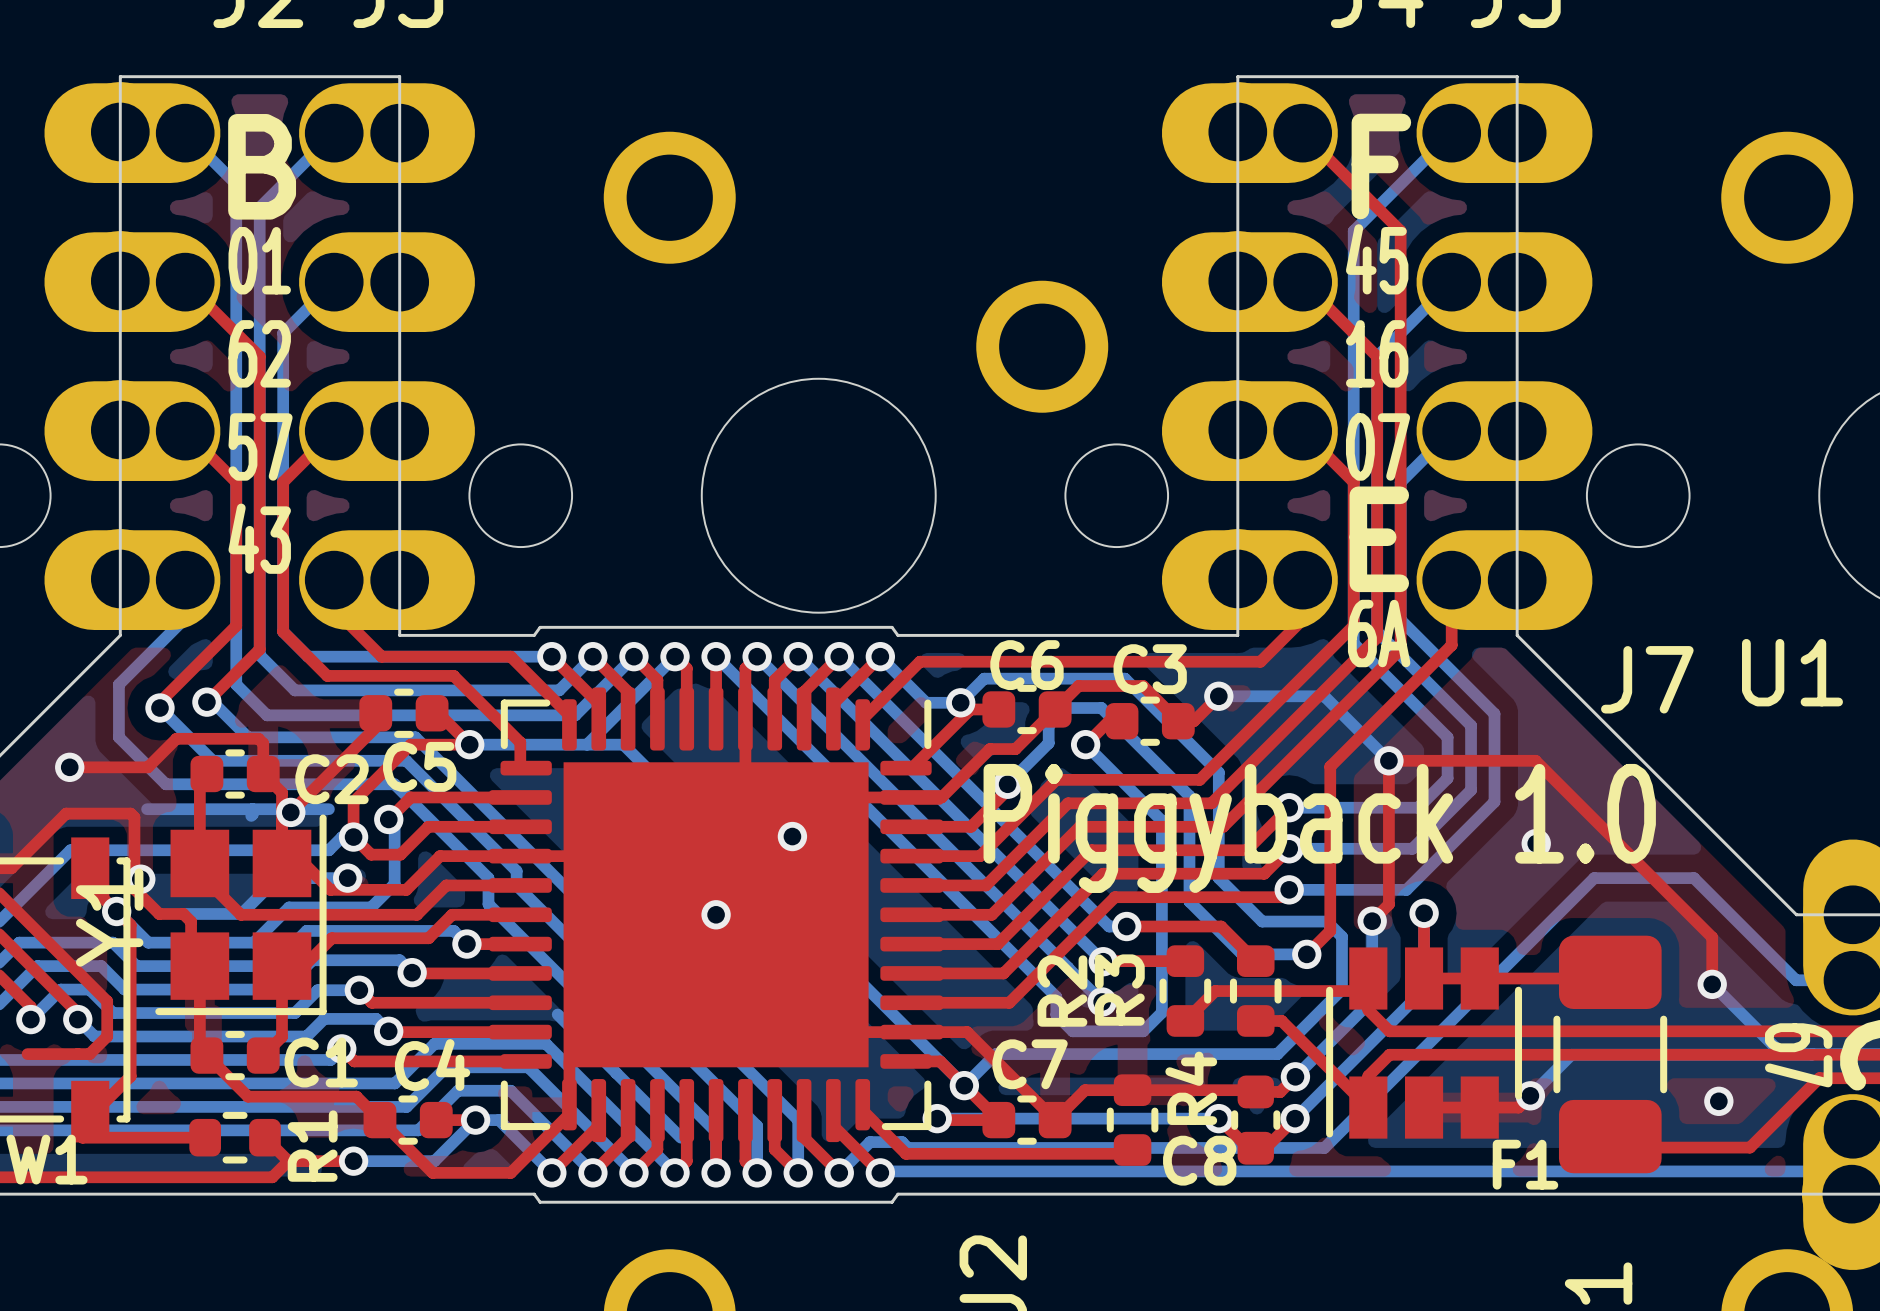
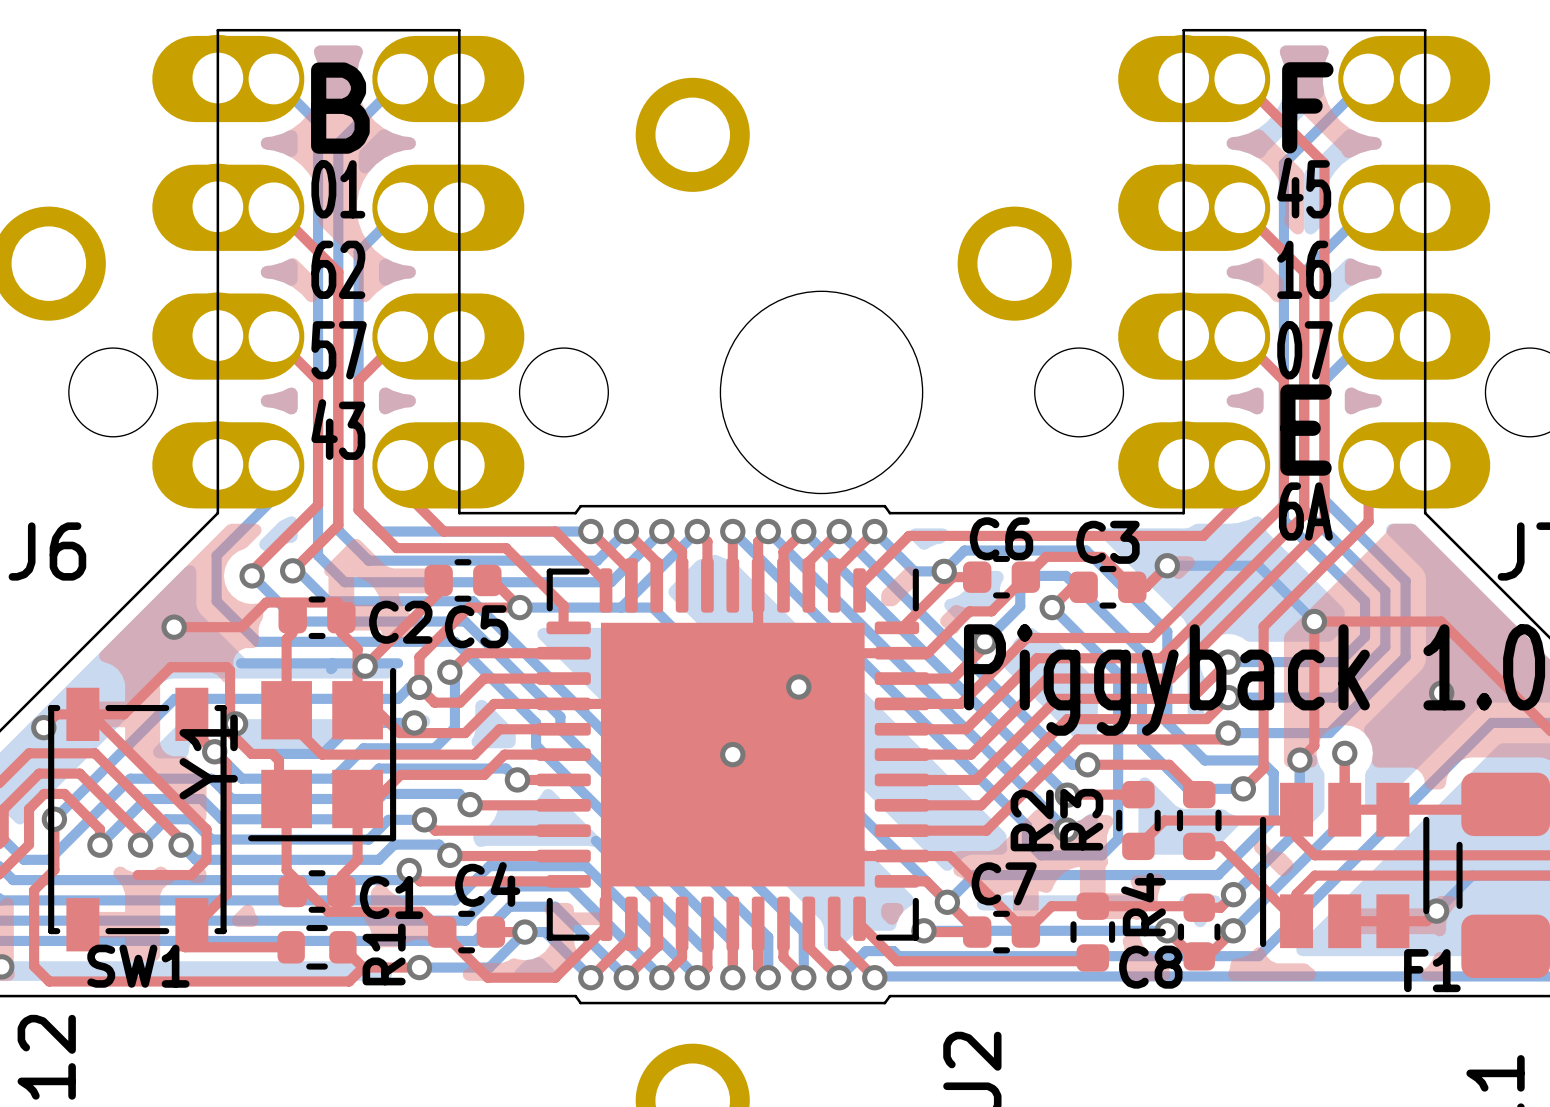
C2 position: (235, 774) -> (317, 617)
C1 position: (235, 1055) -> (317, 891)

